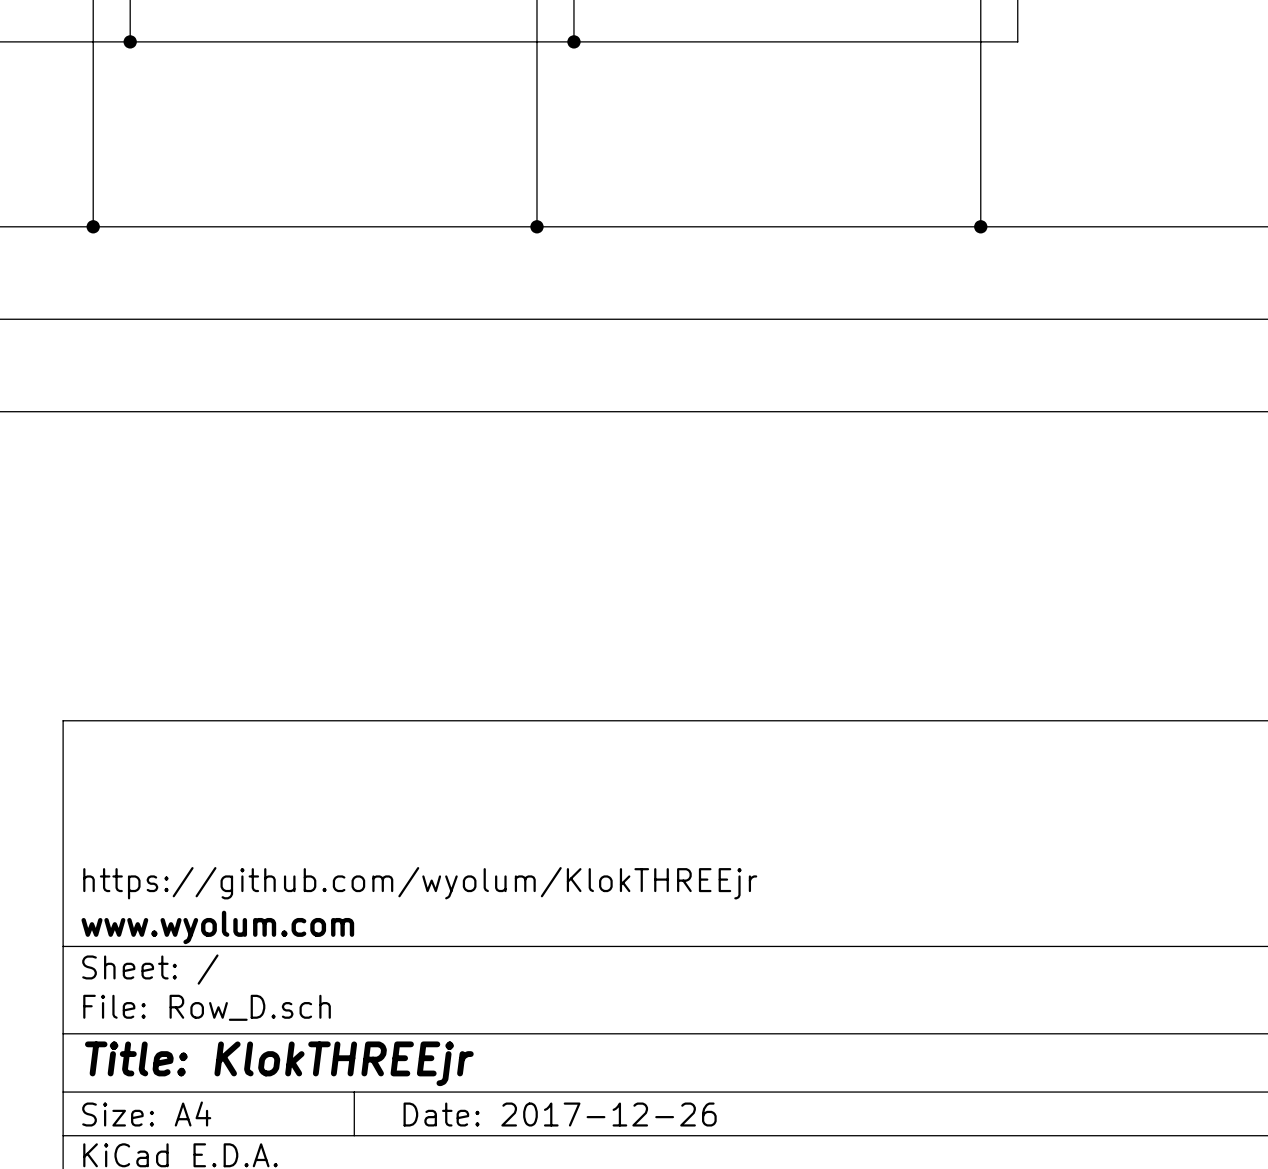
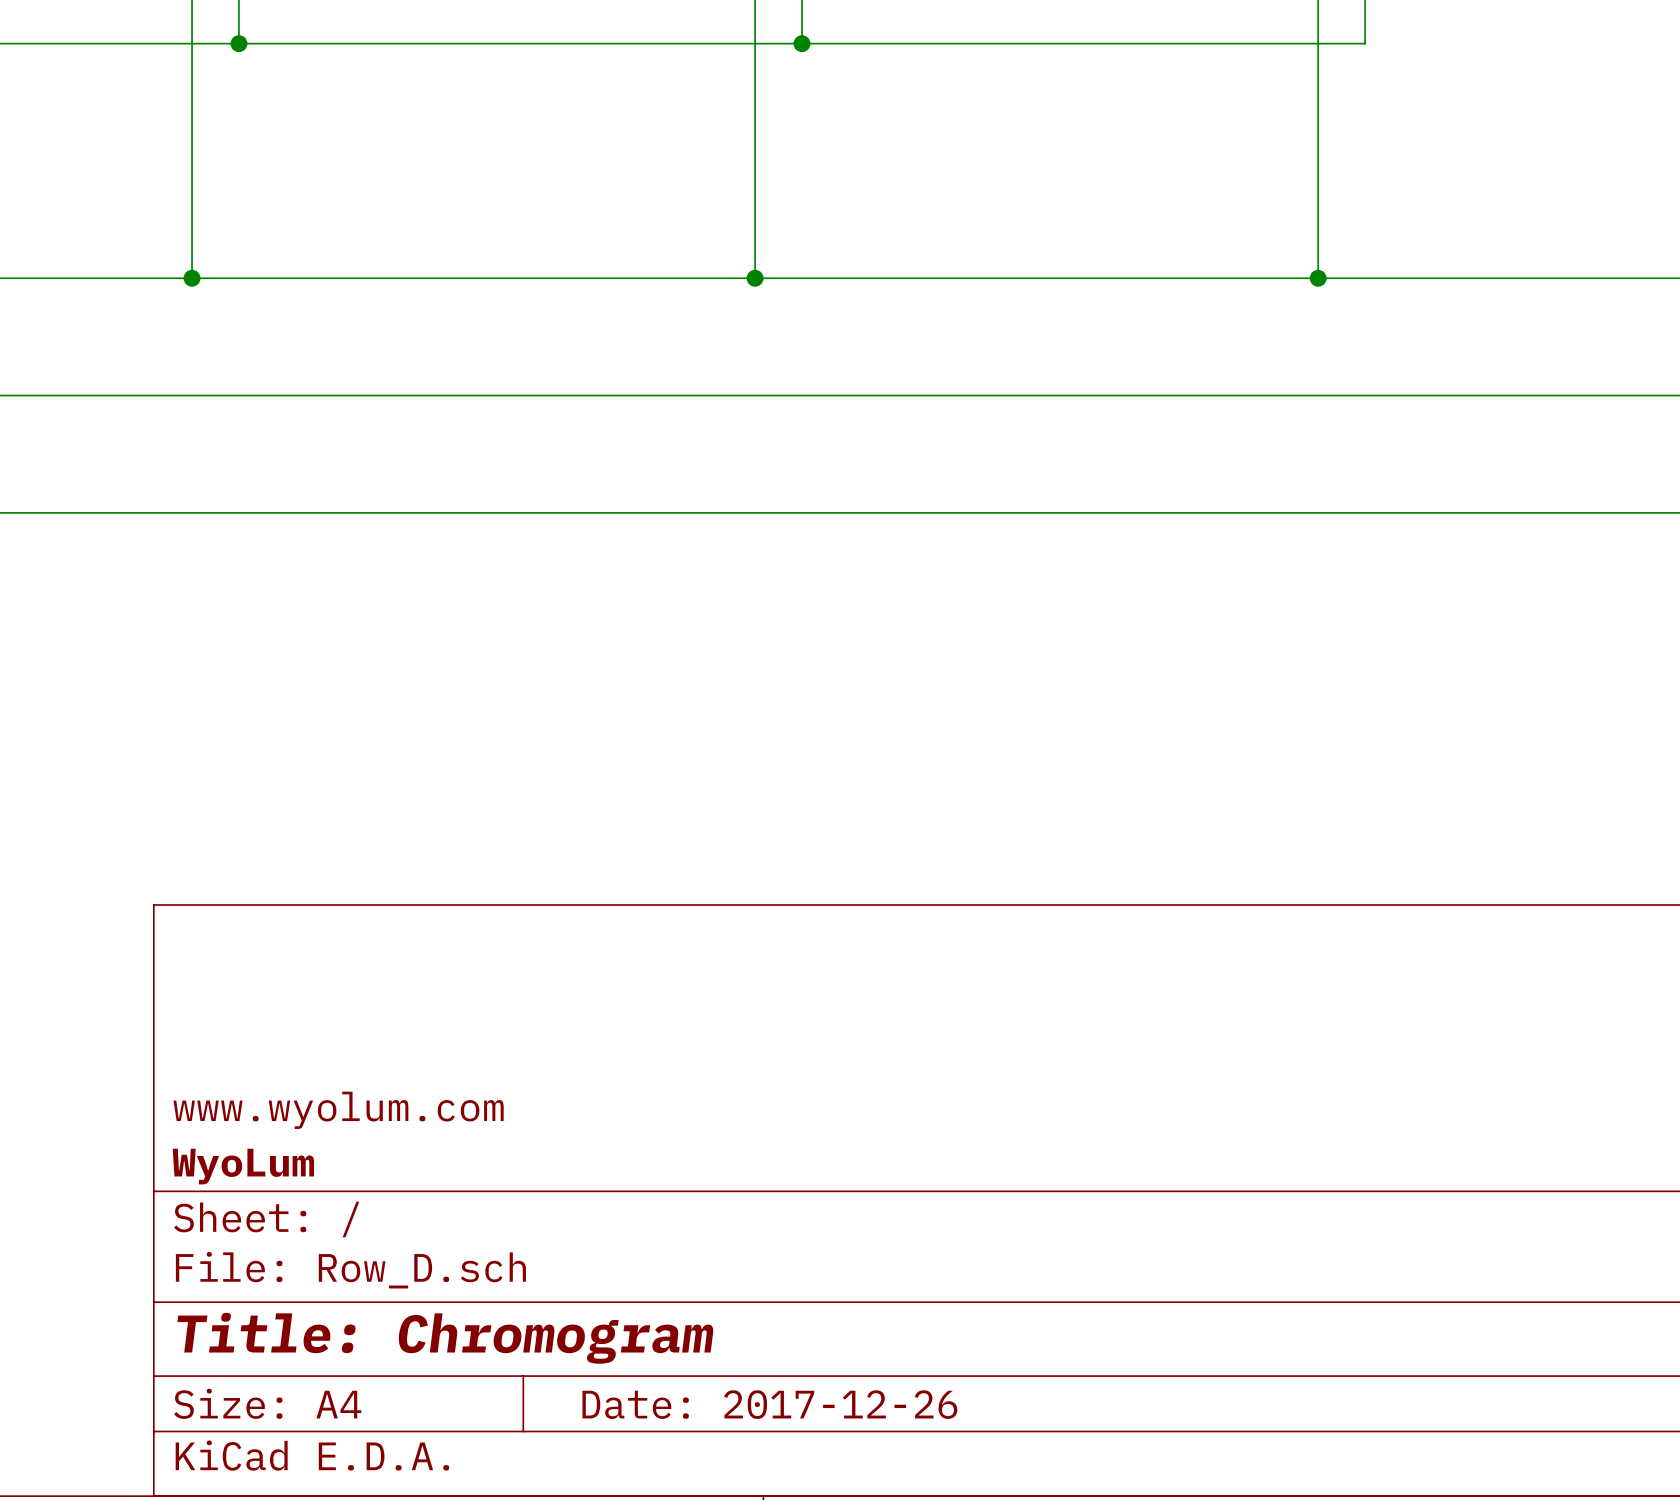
title block: https://github.com/wyolum/KlokTHREEjr (420, 883) -> www.wyolum.com (338, 1110)
title block: www.wyolum.com (217, 927) -> WyoLum (243, 1166)
title block: Title: KlokTHREEjr (279, 1063) -> Title: Chromogram (445, 1338)

